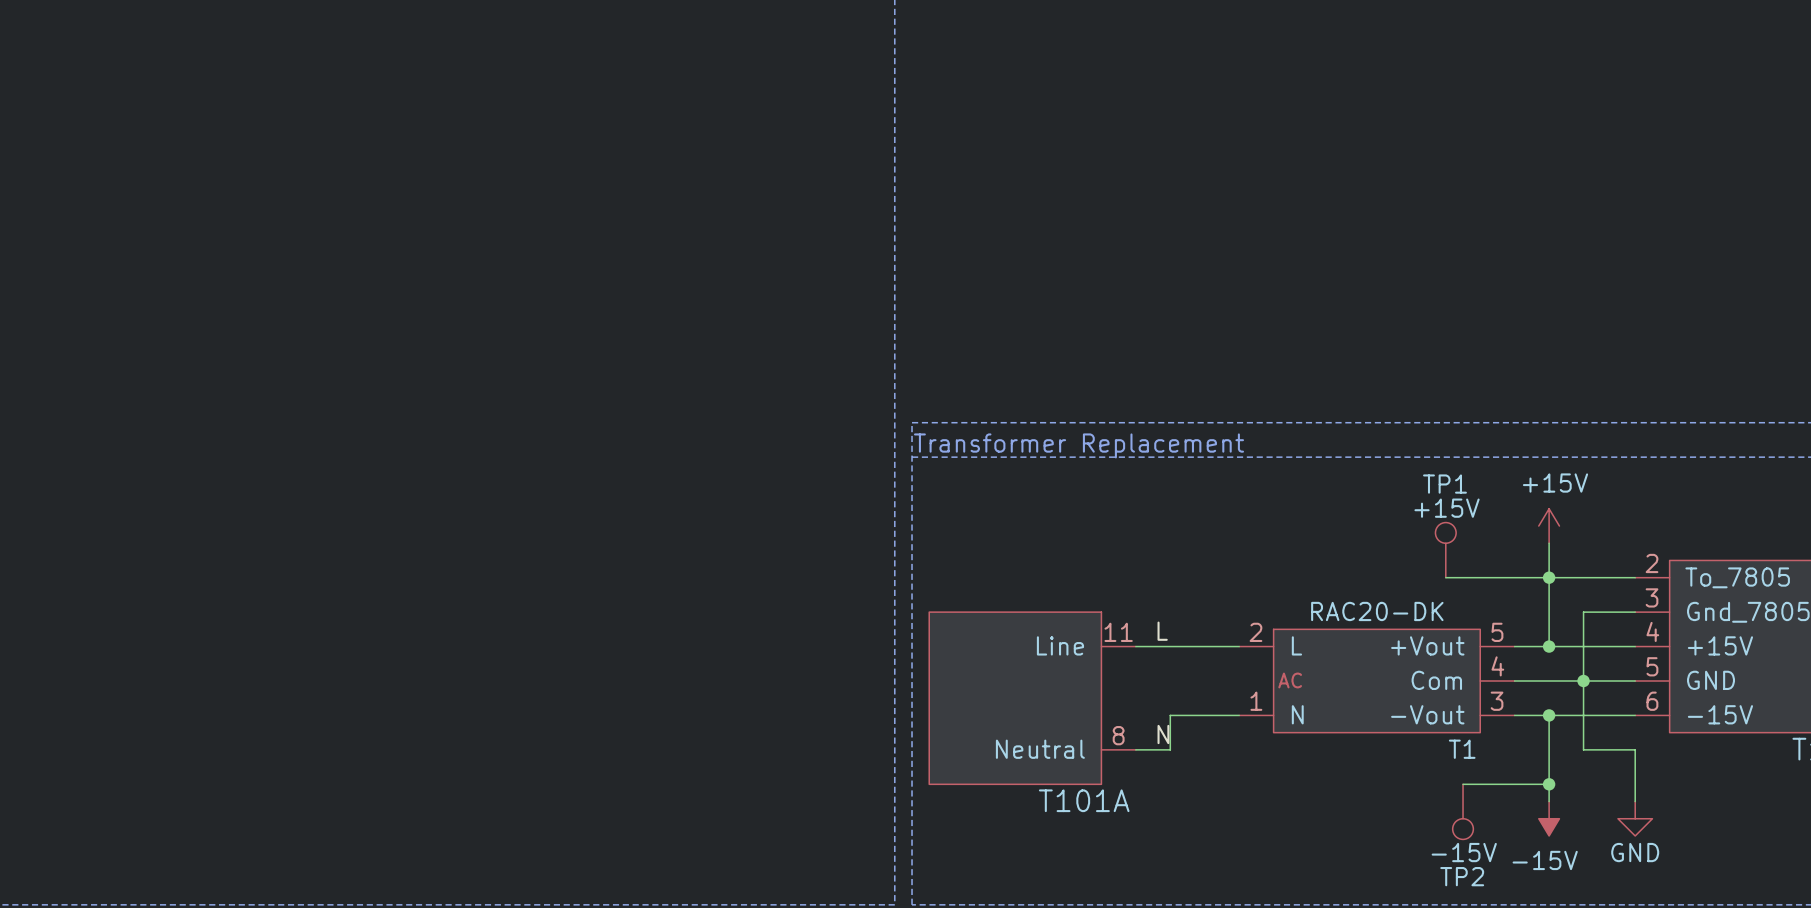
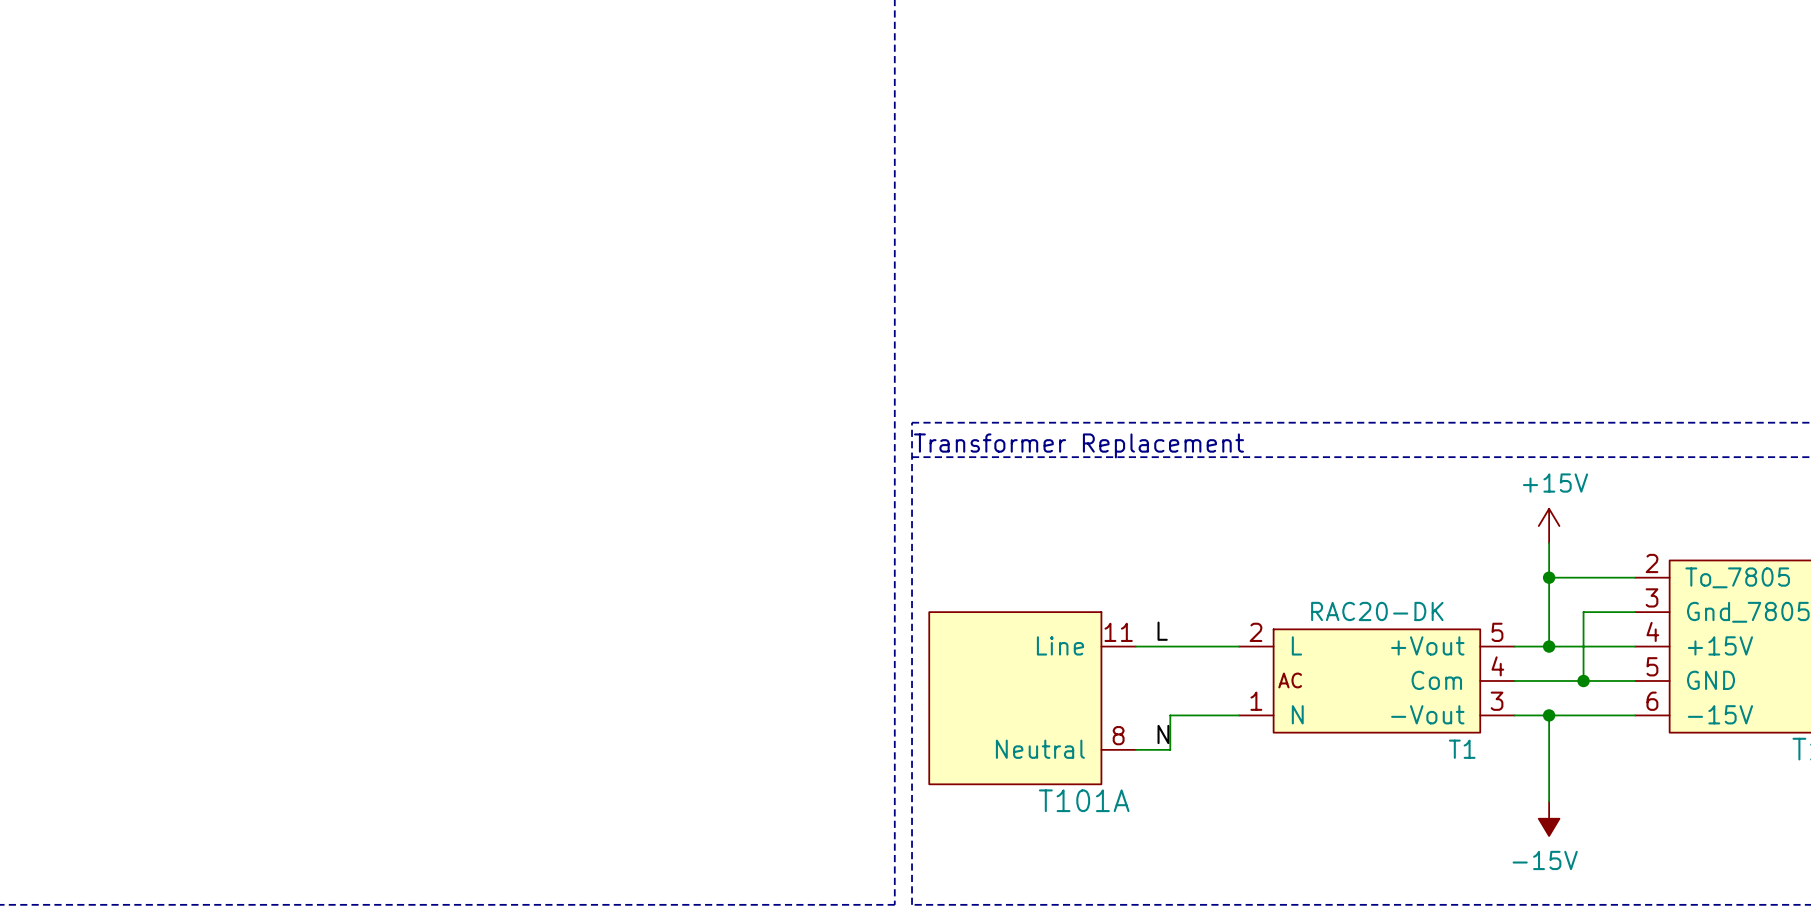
TP1: +15V (1445, 550) -> none
wire: (1445, 577) (1549, 577) -> none
wire: (1583, 680) (1583, 749) (1635, 749) (1635, 801) -> none
wire: (1463, 784) (1549, 784) -> none
junction: (1549, 784) -> none
TP2: -15V (1463, 811) -> none
power symbol: GND (1635, 818) -> none

